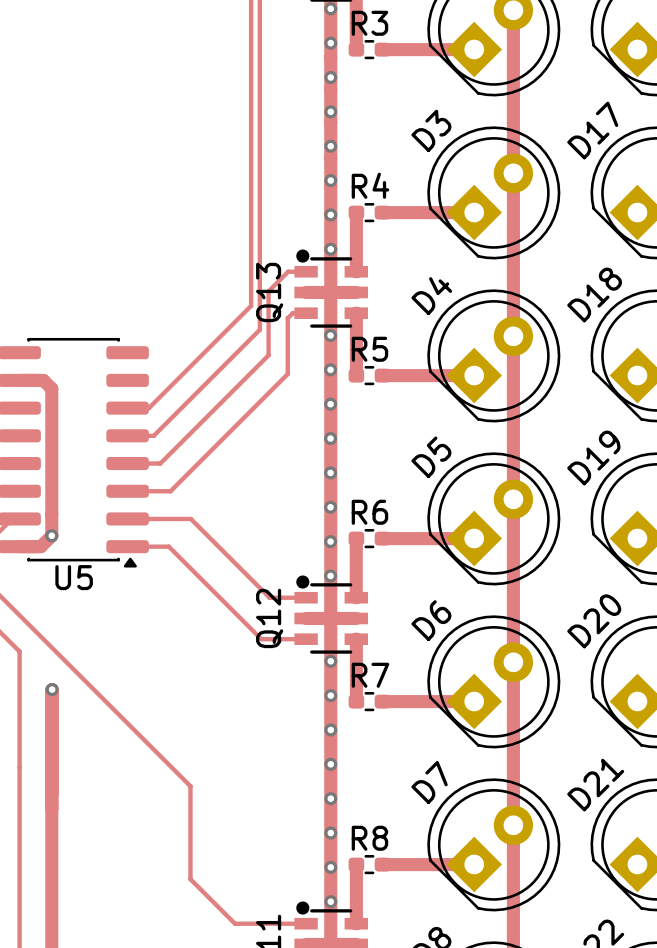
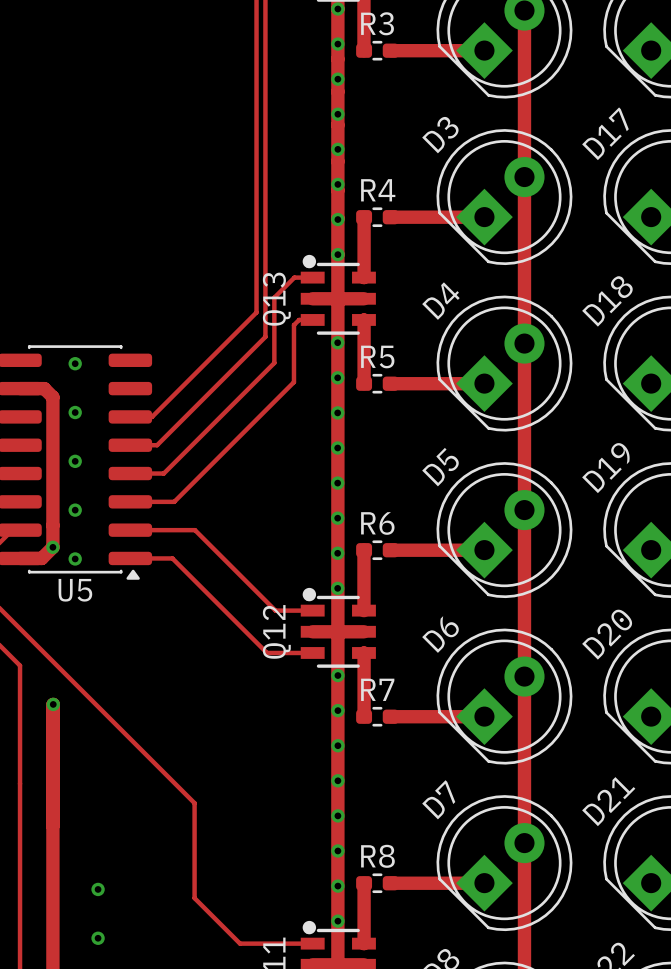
via: none -> (75, 363)
via: none -> (75, 412)
via: none -> (75, 461)
via: none -> (75, 510)
via: none -> (75, 558)
via: none -> (98, 889)
via: none -> (98, 938)

